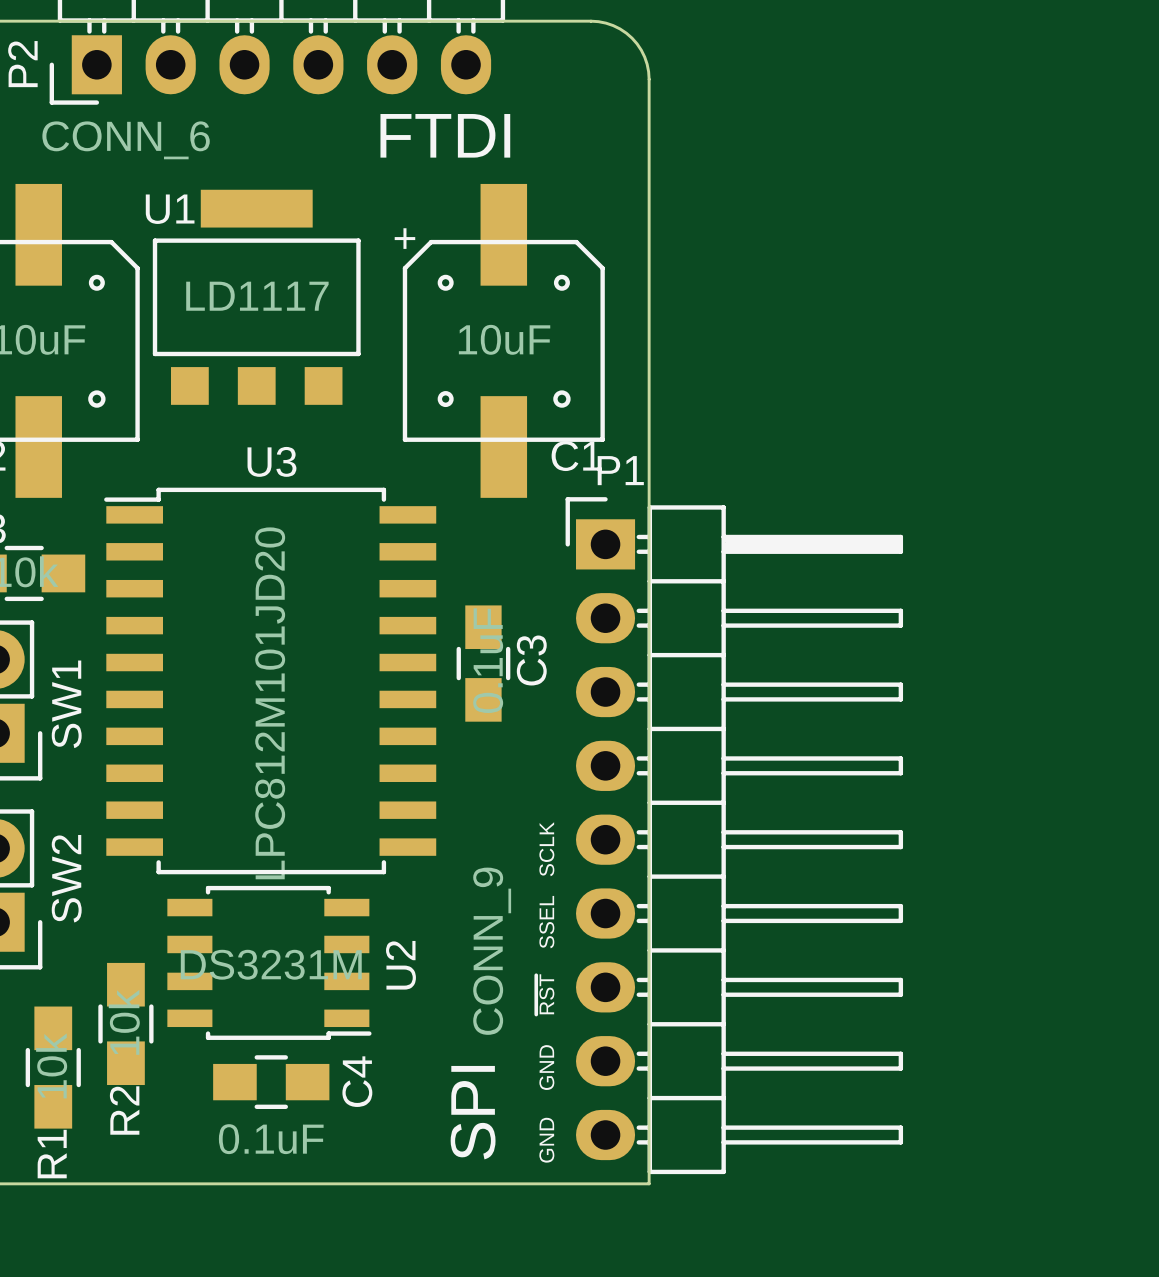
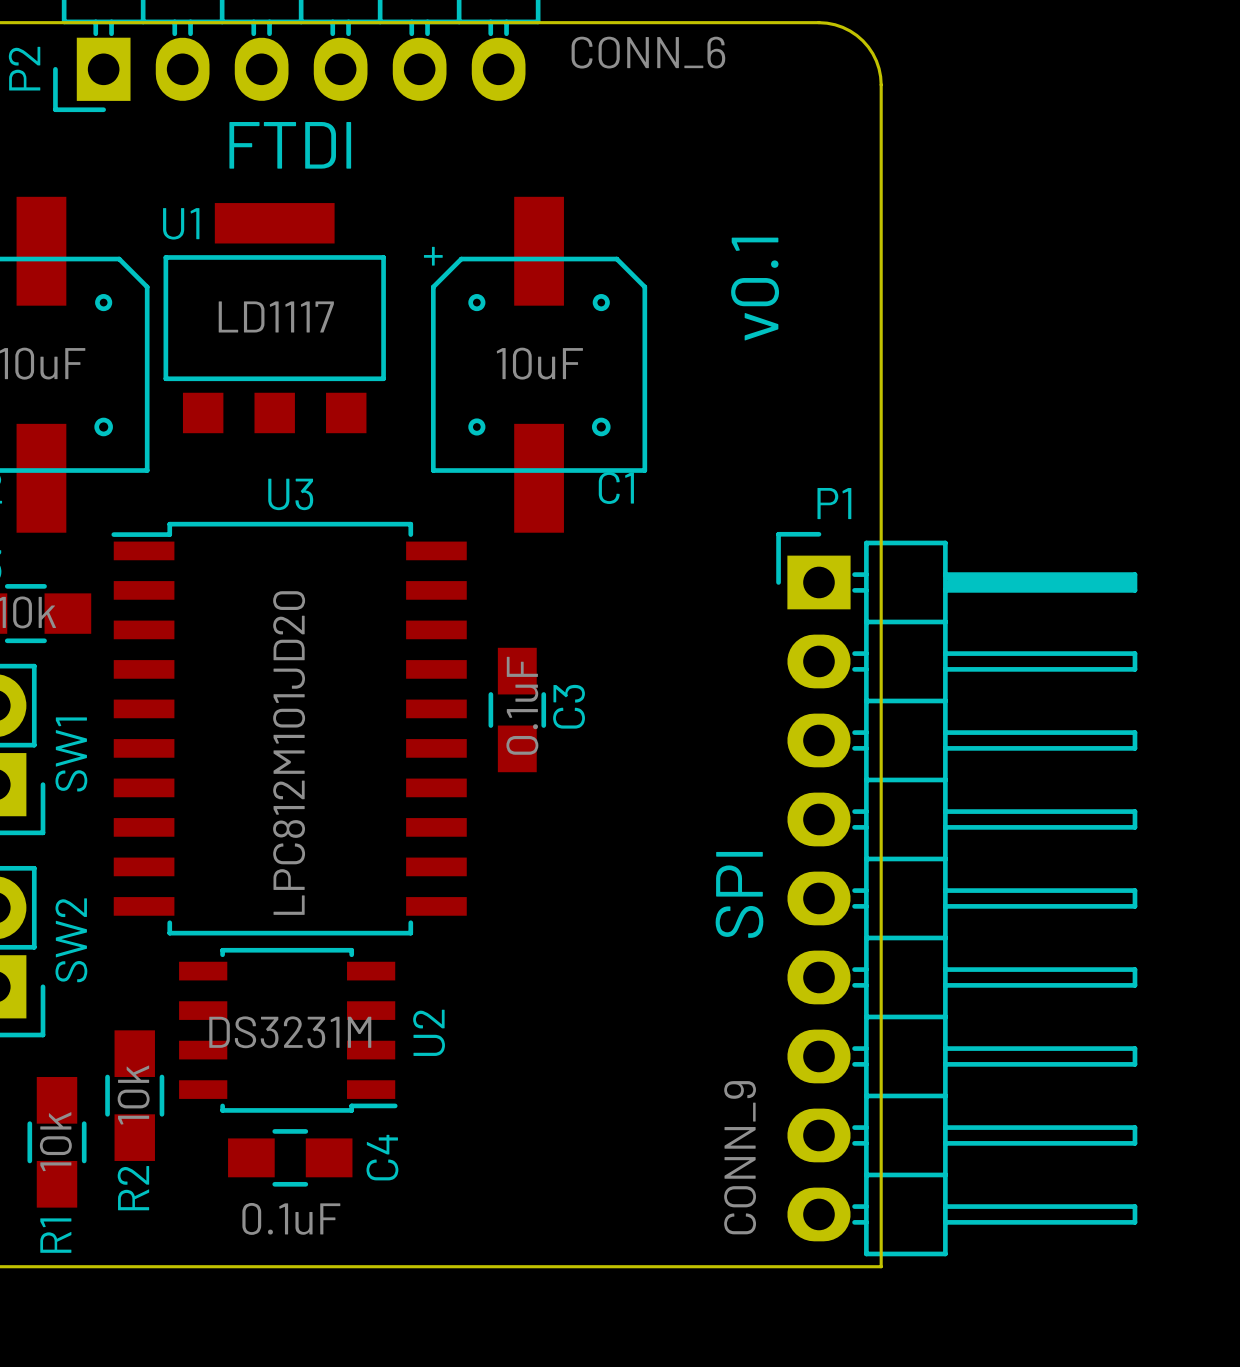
board edge: (591, 21) (613, 25) (632, 38) (644, 57) (649, 79) (649, 1183) -> (632, 22) (818, 22) (835, 24) (850, 30) (868, 46) (876, 61) (881, 84) (881, 1266) (694, 1266)
text position: FTDI (445, 135) -> FTDI (290, 145)
P2 value position: CONN_6 (126, 140) -> CONN_6 (648, 52)
text: none -> v0.1 (755, 289)
P1 position: (734, 835) -> (956, 894)
text: SCLK (546, 849) -> none
text: SSEL (546, 922) -> none
P1 value position: CONN_9 (492, 951) -> CONN_9 (740, 1157)
text: ~{RST} (545, 994) -> none
text: GND (546, 1067) -> none
text position: SPI (473, 1112) -> SPI (739, 894)
text: GND (546, 1140) -> none

